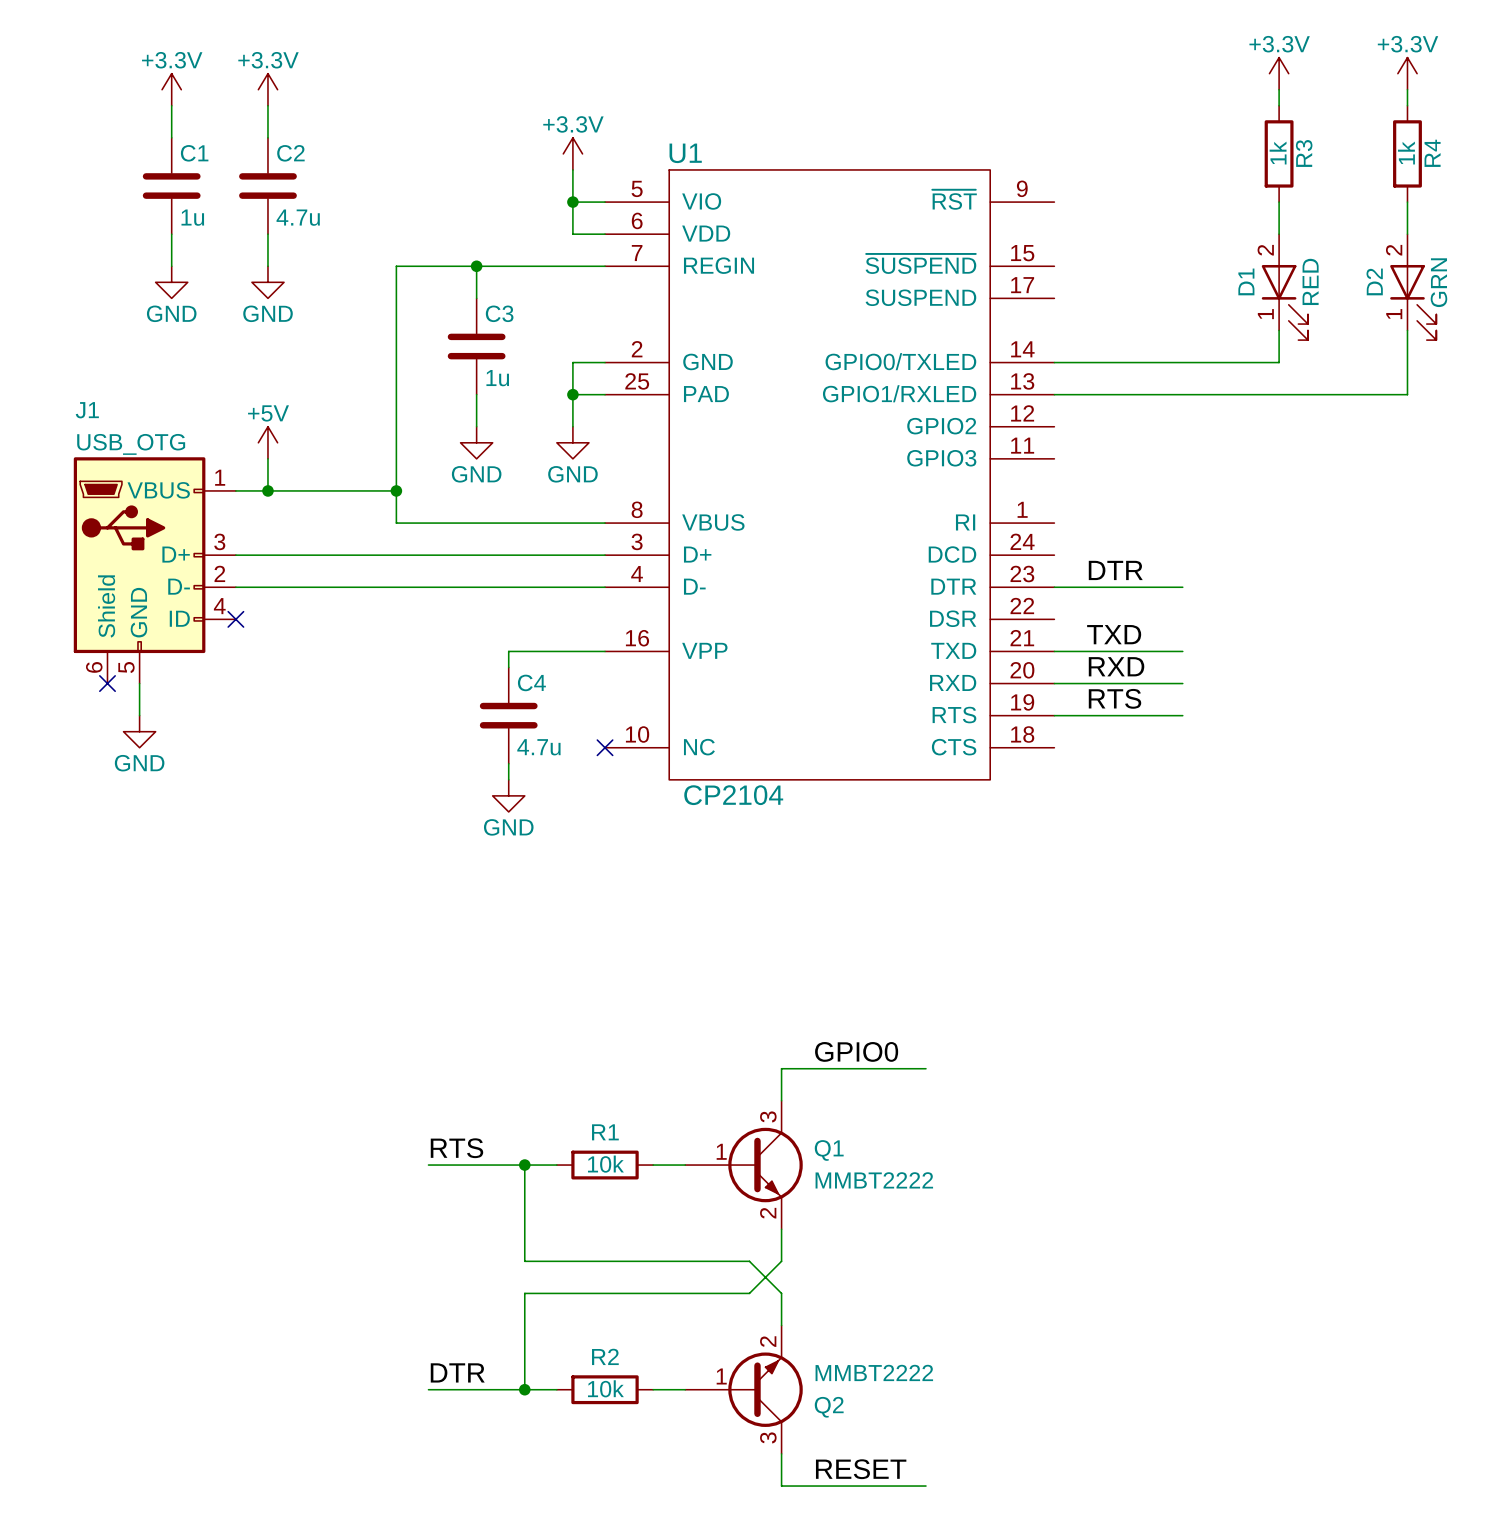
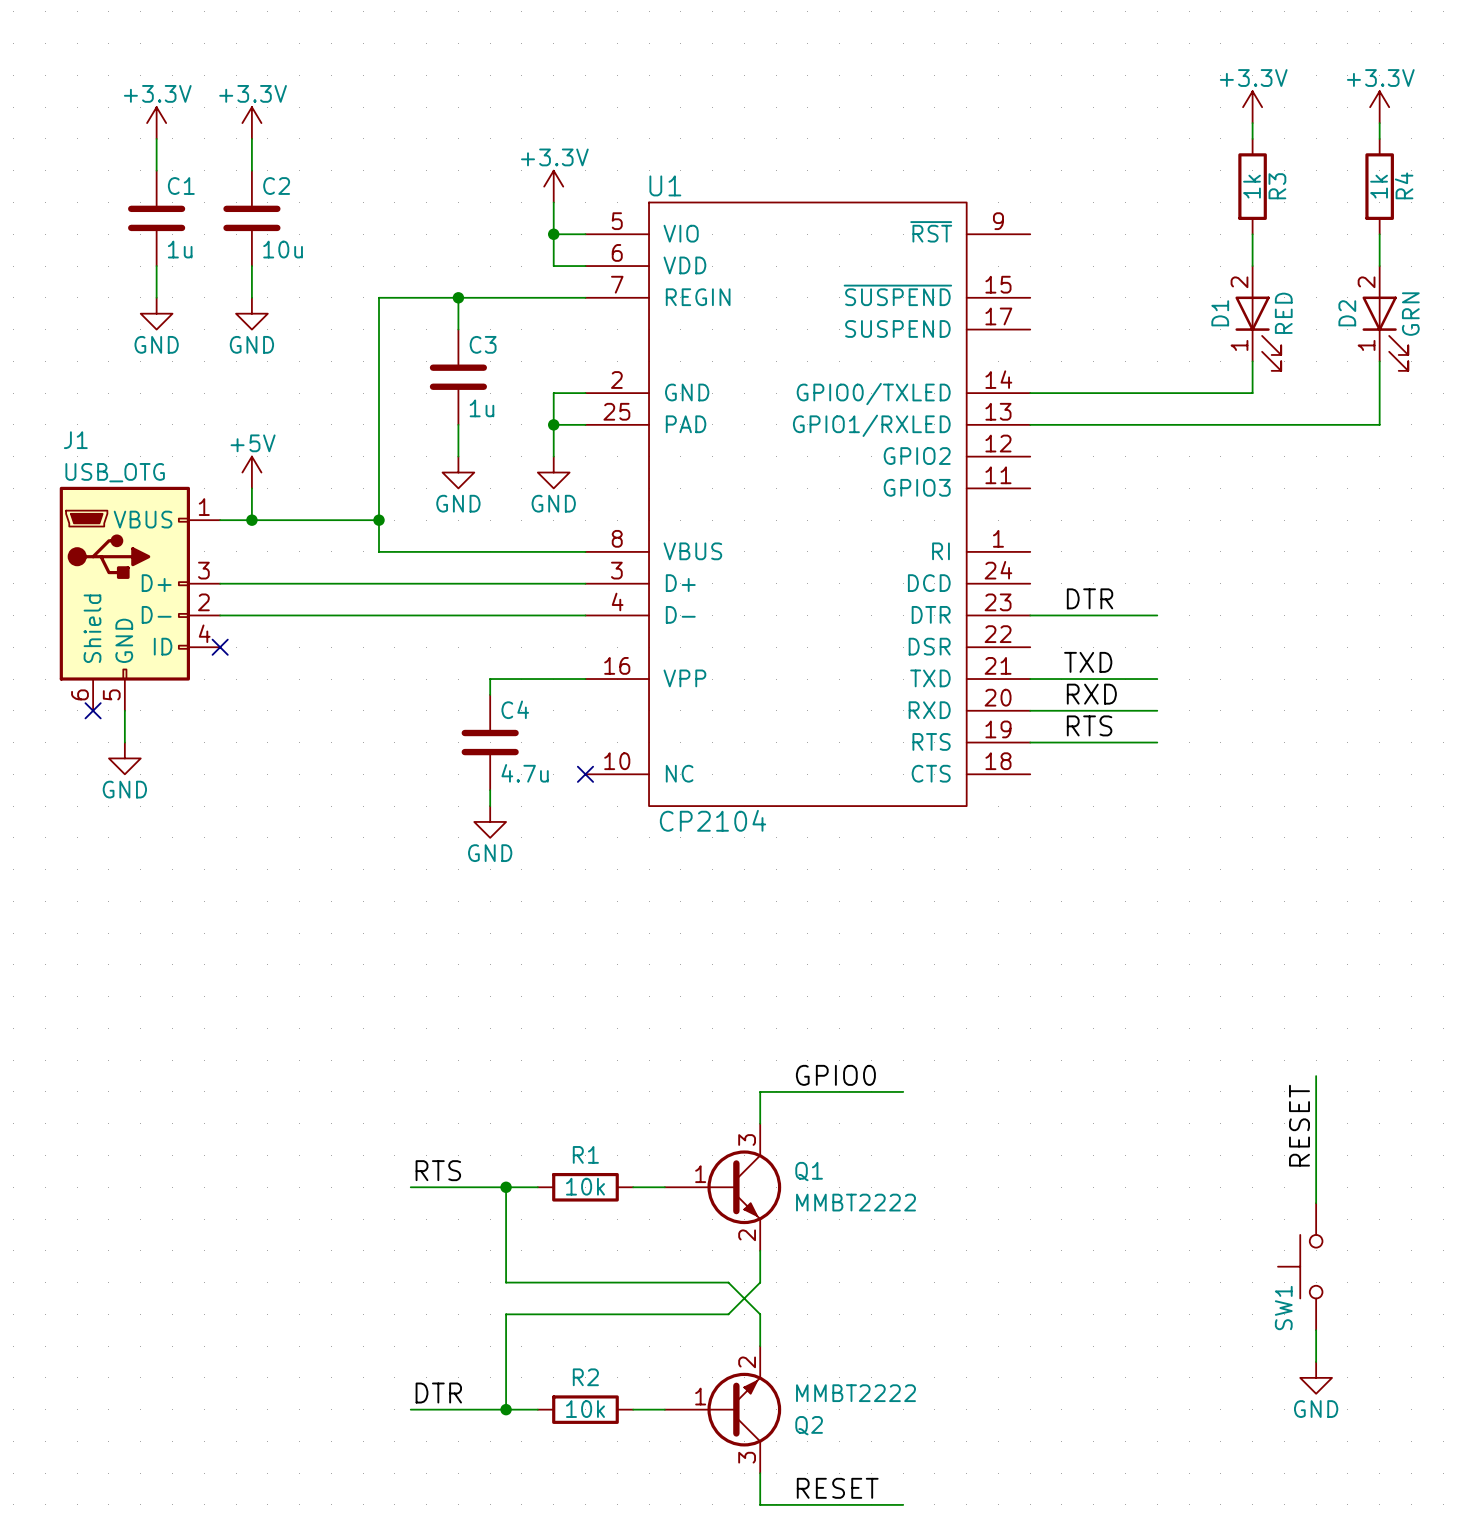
C2 value: 4.7u (298, 217) -> 10u (283, 249)
wire: none -> (1316, 1076) (1316, 1203)
label: none -> RESET (1299, 1125)
SW1: none -> (1300, 1266)
wire: none -> (1316, 1330) (1316, 1362)
power symbol: none -> GND (1316, 1377)

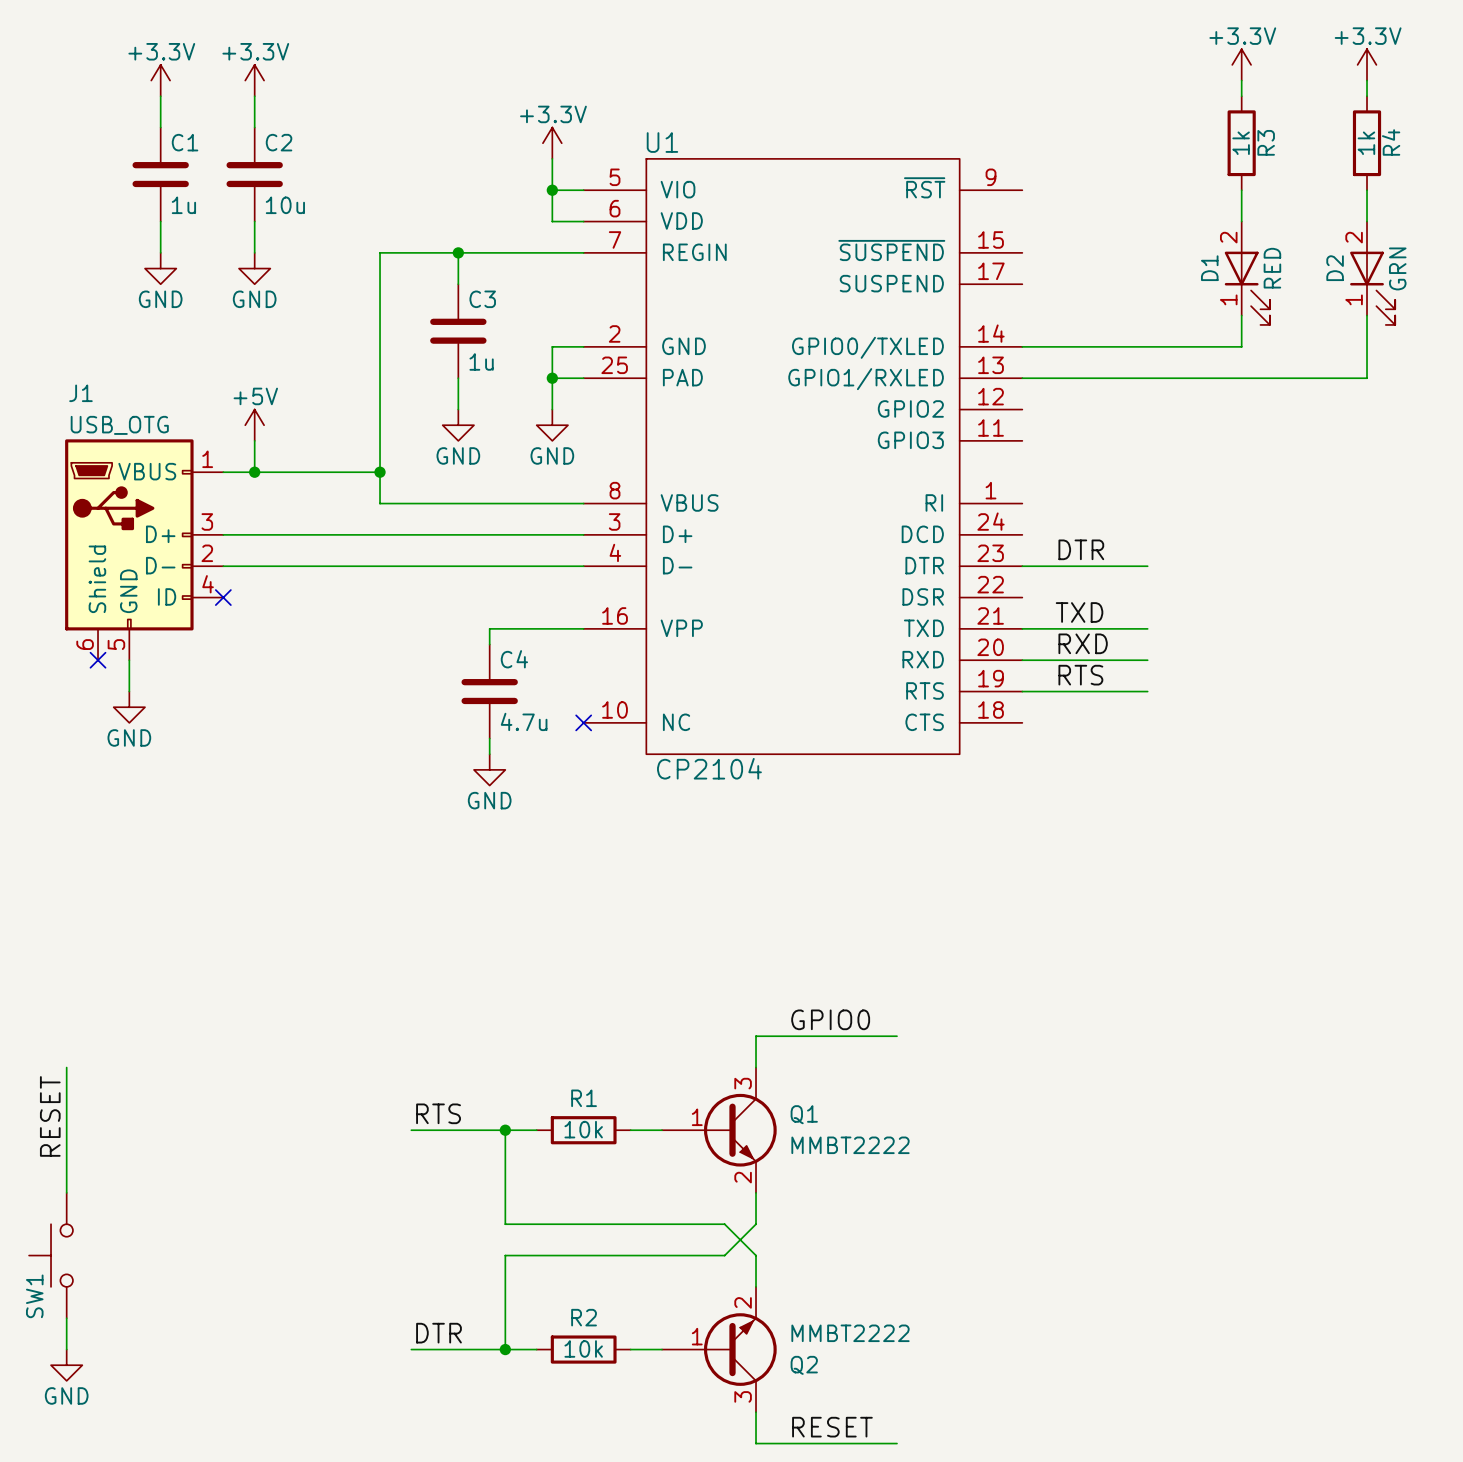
wire: (1316, 1076) (1316, 1203) -> none
wire: none -> (66, 1067) (66, 1192)
label: RESET (1299, 1125) -> none
label: none -> RESET (50, 1116)
SW1 position: (1300, 1266) -> (51, 1255)
wire: (1316, 1330) (1316, 1362) -> none
wire: none -> (66, 1318) (66, 1349)
power symbol: GND (1316, 1377) -> none
power symbol: none -> GND (66, 1365)

